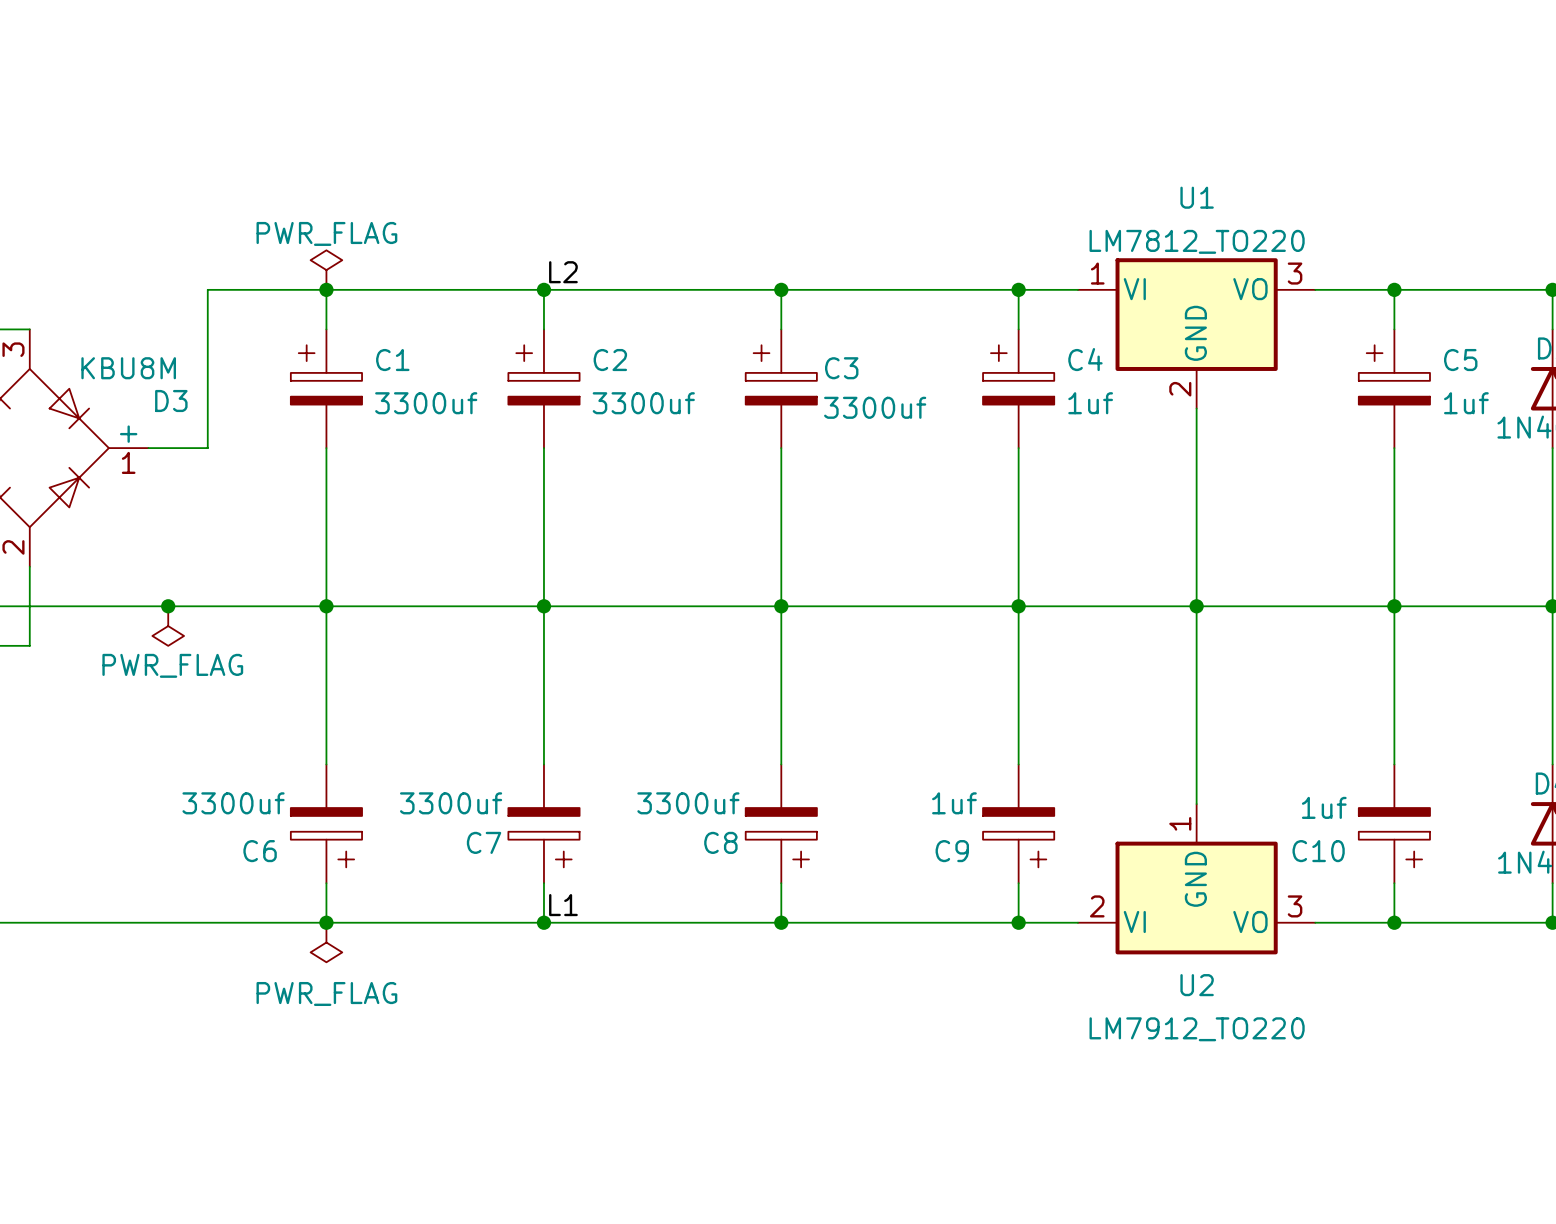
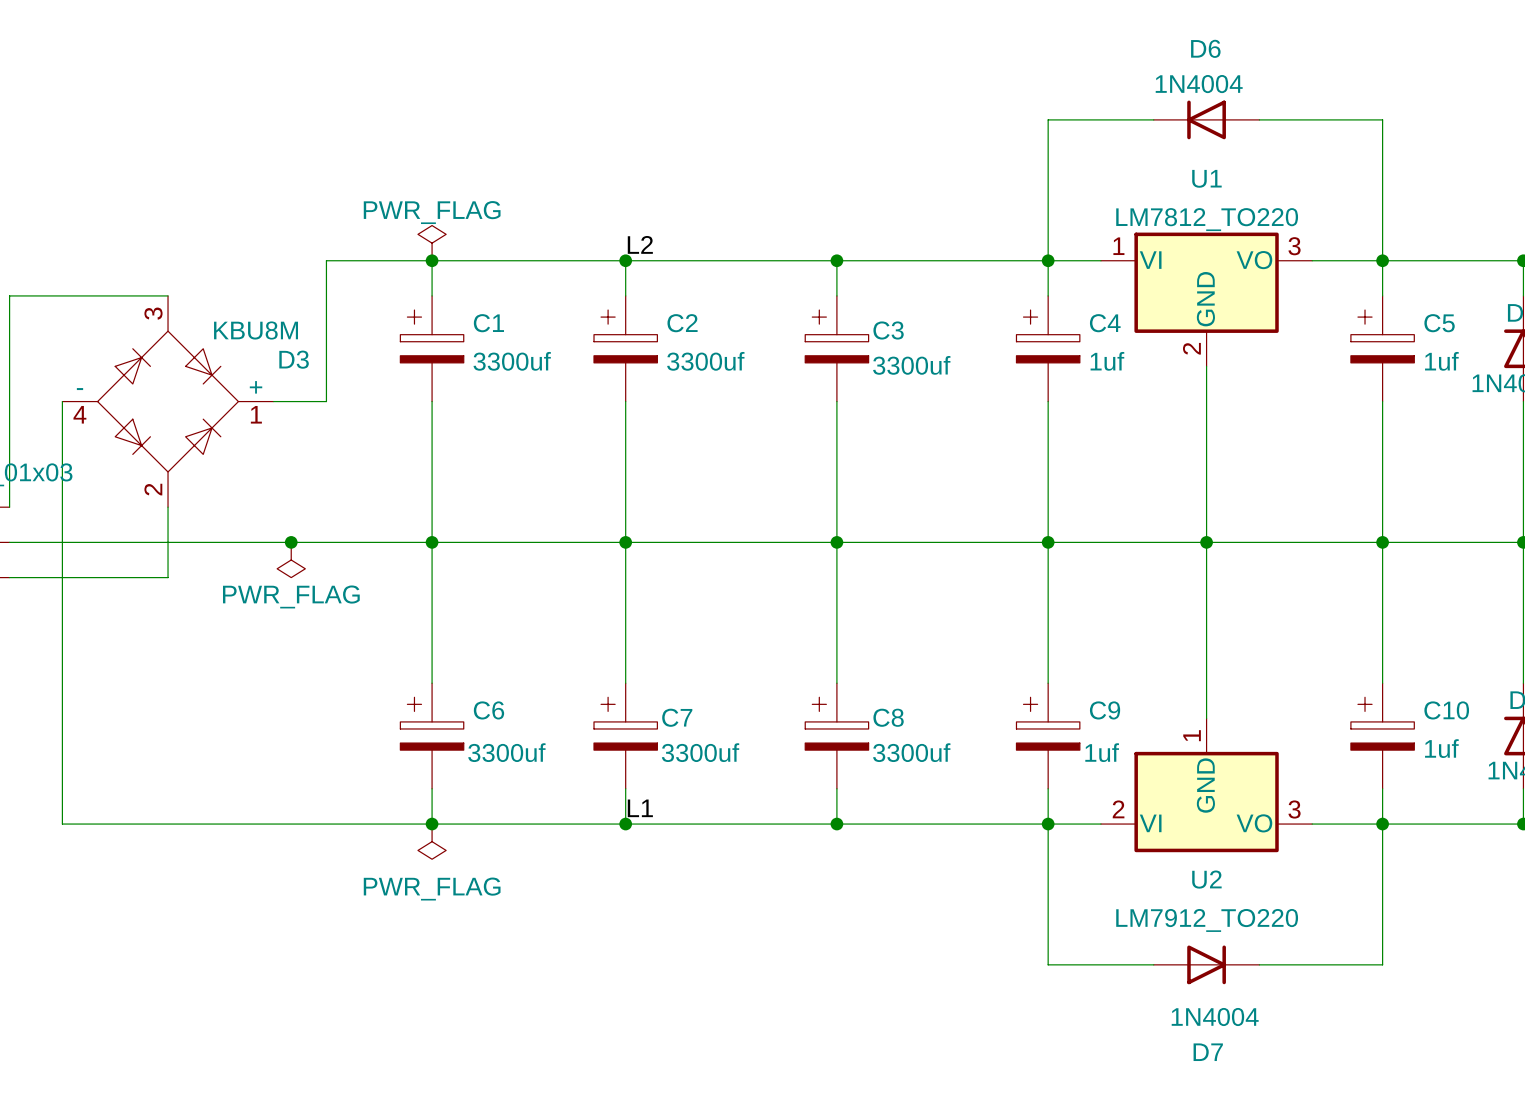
wire: none -> (1153, 119) (1048, 119) (1048, 260)
D6: none -> 1N4004 (1206, 119)
wire: none -> (1259, 119) (1382, 119) (1382, 260)
C6 rotation: 0° (326, 837) -> 180° (432, 723)
C7 rotation: 0° (543, 837) -> 180° (625, 723)
C8 rotation: 0° (781, 837) -> 180° (836, 723)
C9 rotation: 0° (1018, 837) -> 180° (1048, 723)
C10 rotation: 0° (1394, 837) -> 180° (1382, 723)
wire: none -> (1048, 824) (1048, 964) (1153, 964)
wire: none -> (1382, 824) (1382, 964) (1259, 964)
D7: none -> 1N4004 (1206, 964)

